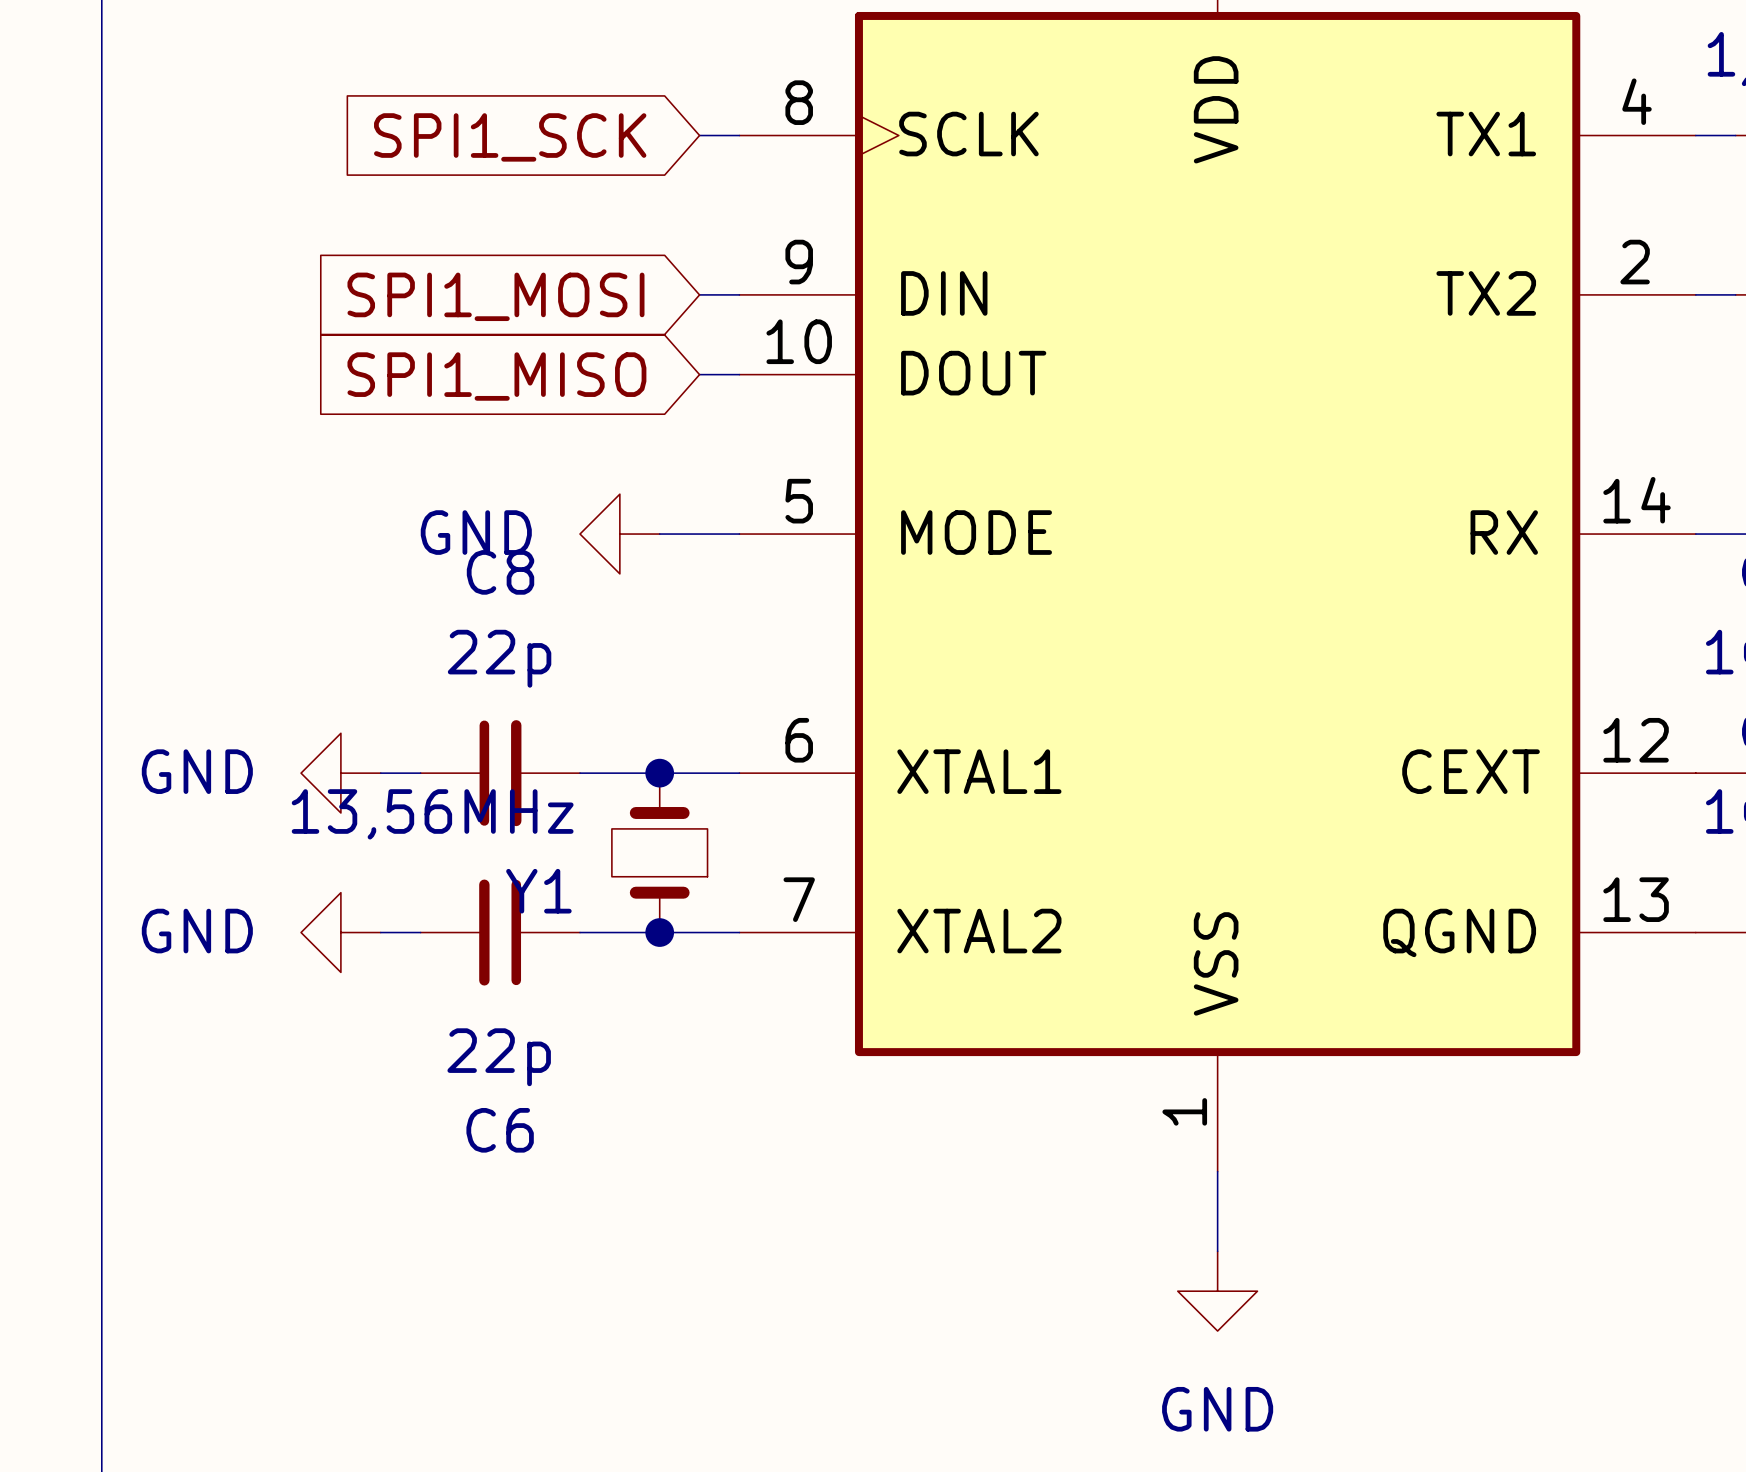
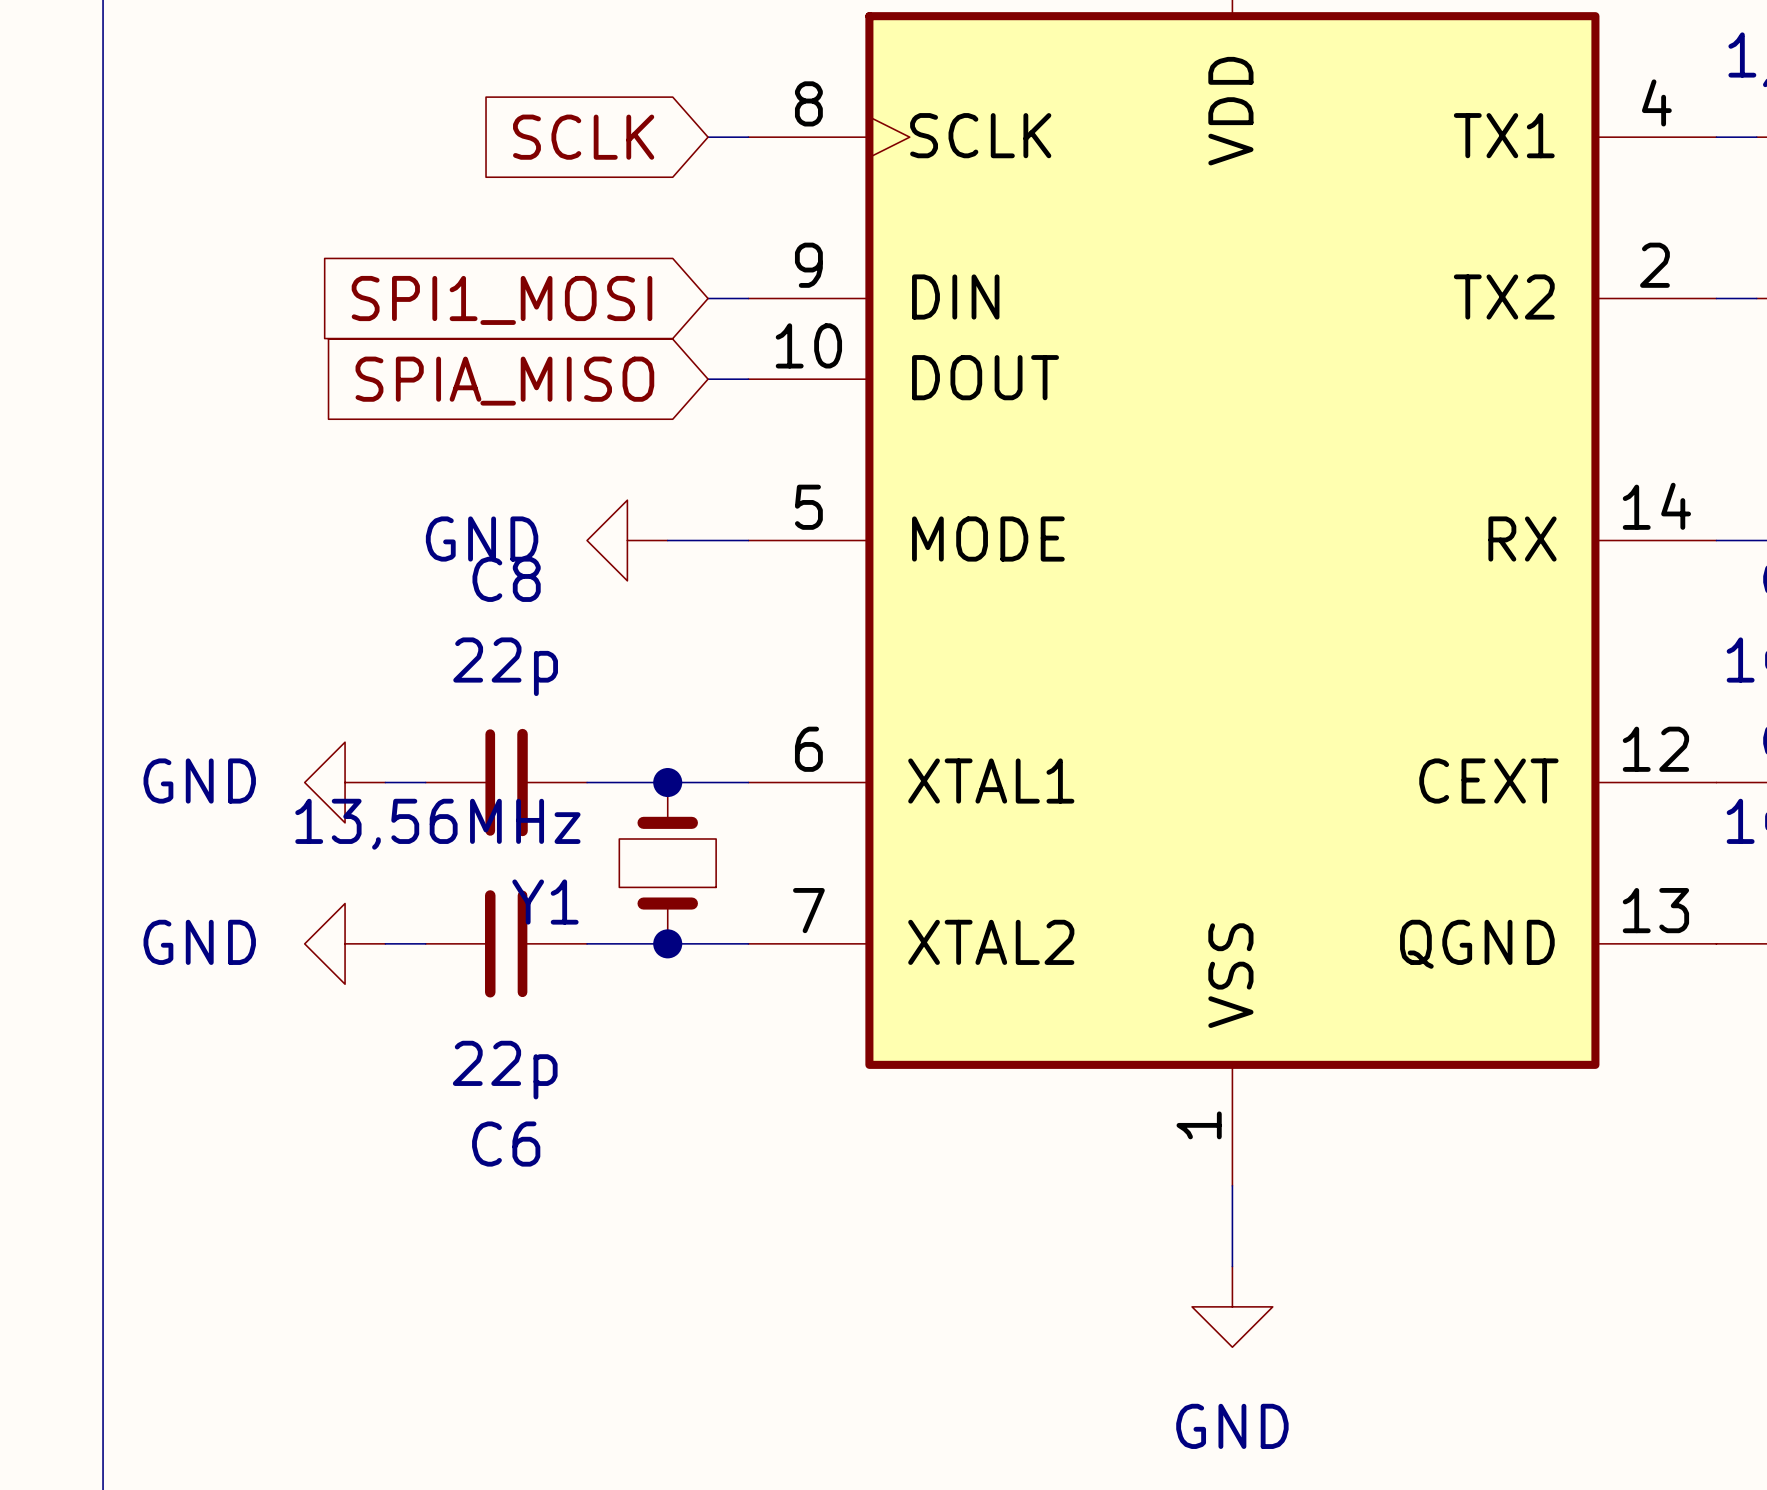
global label: SPI1_SCK (510, 137) -> SCLK (583, 137)
global label: SPI1_MISO (496, 376) -> SPIA_MISO (504, 381)

